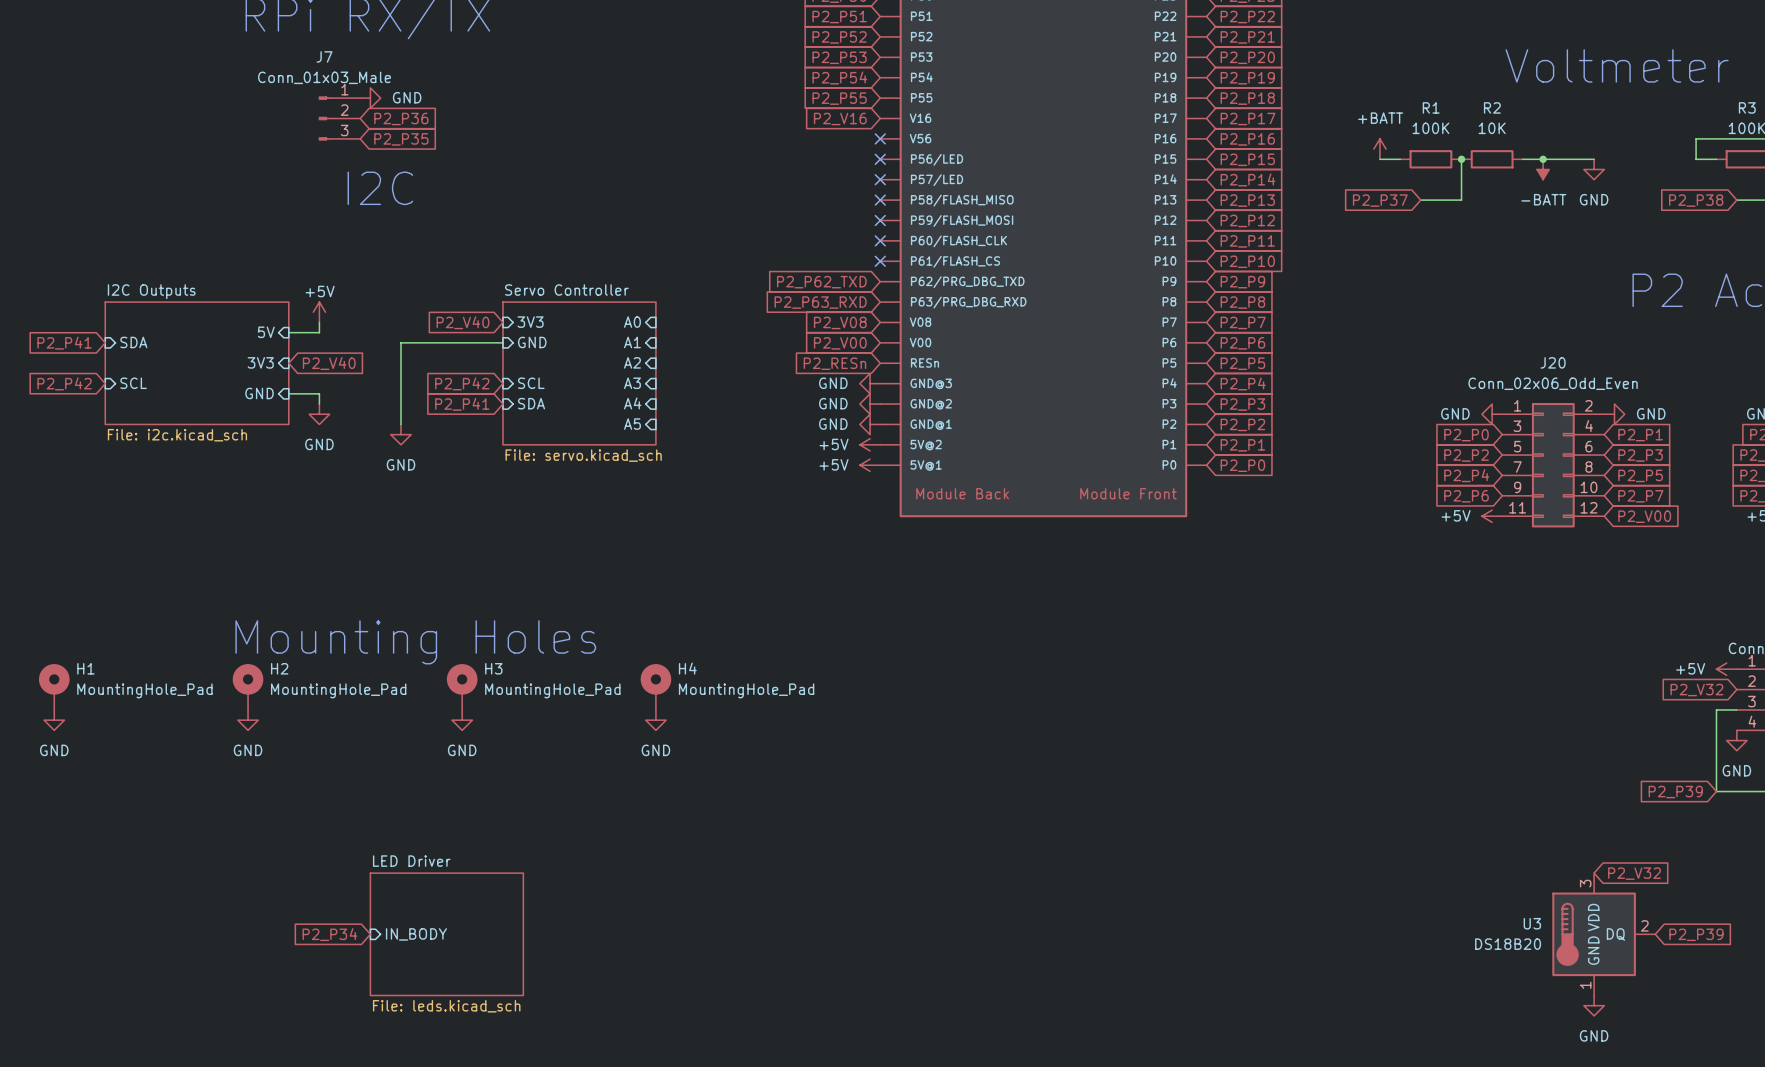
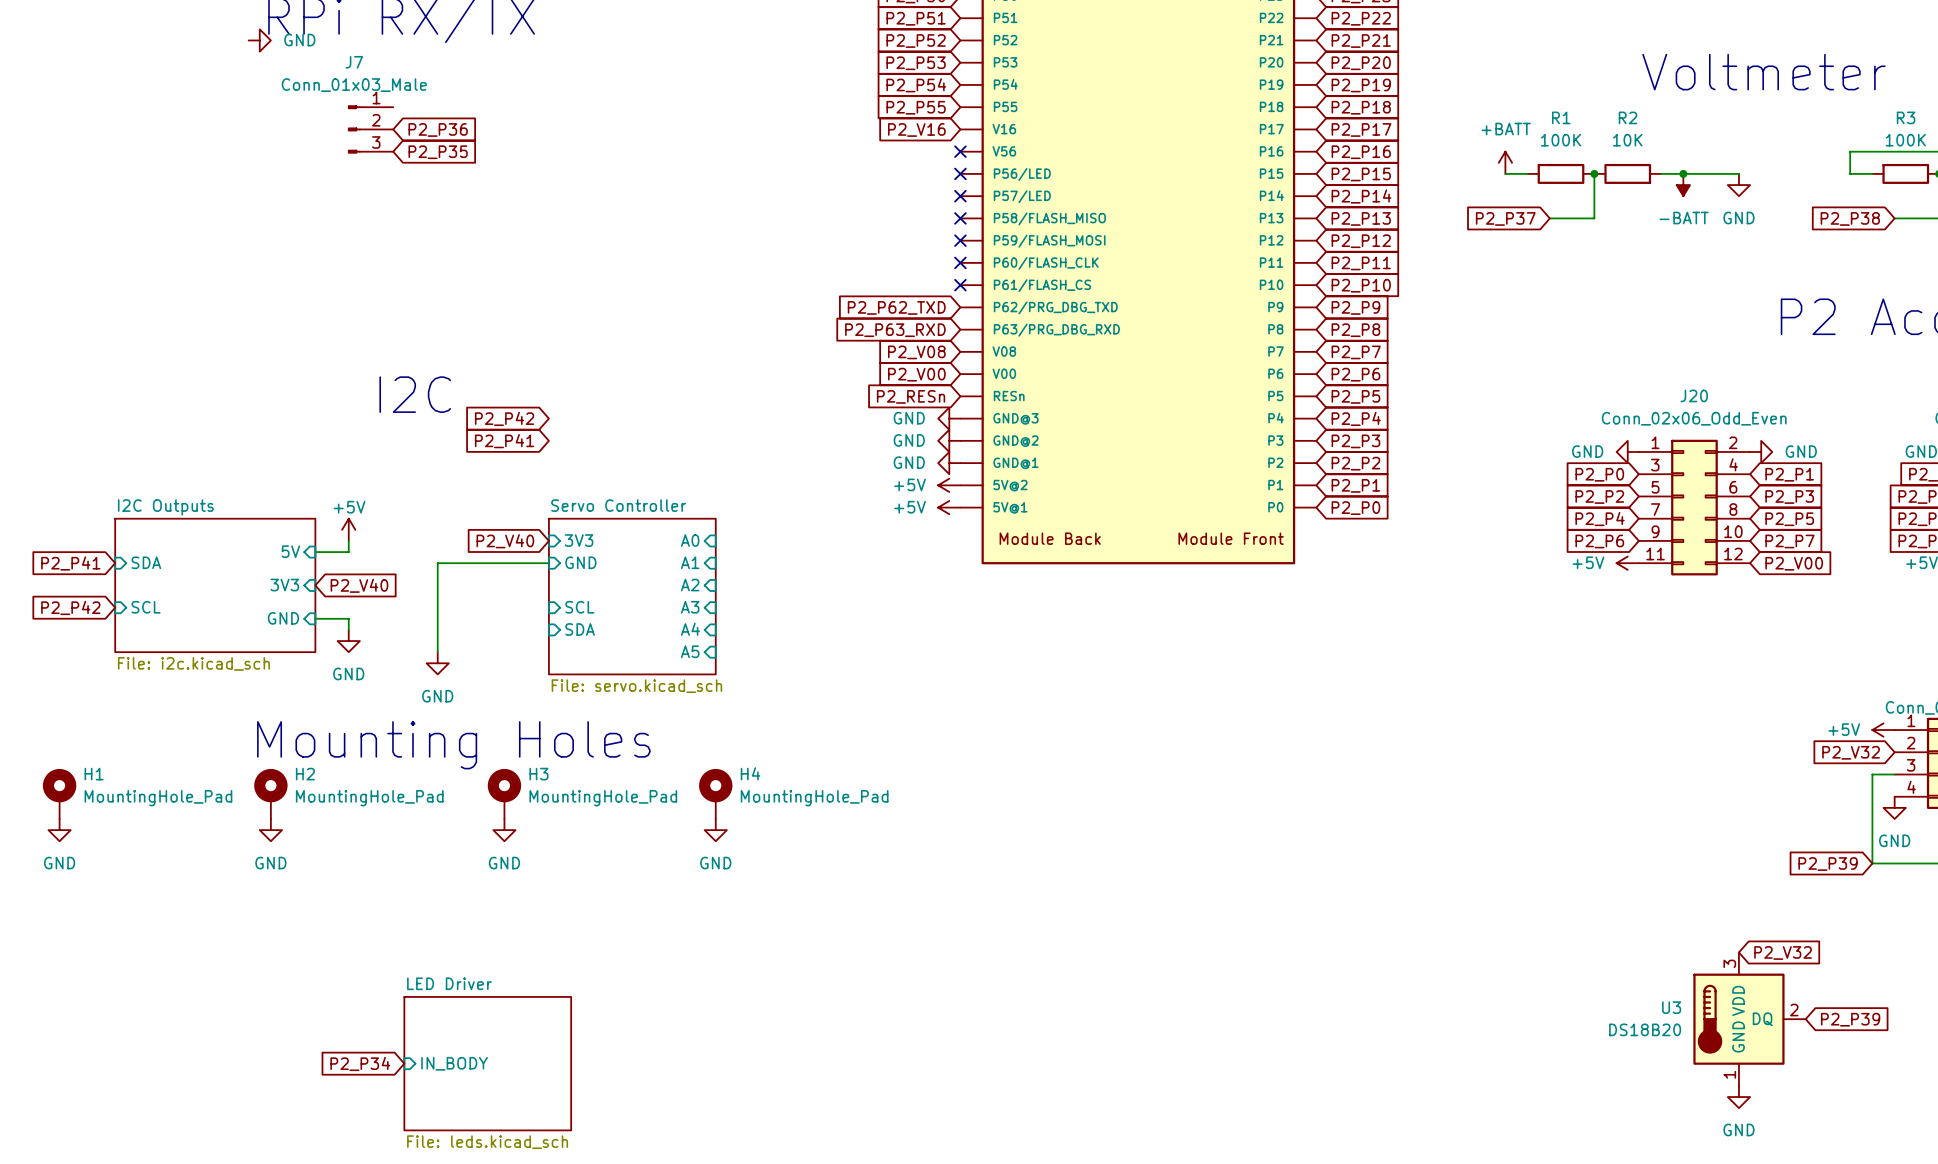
power symbol: none -> GND (259, 40)
power symbol: GND (370, 98) -> none
text position: I2C (380, 188) -> I2C (415, 394)
power symbol position: +5V (319, 312) -> +5V (348, 529)
wire: (319, 322) (319, 332) (288, 332) -> (348, 540) (348, 552) (315, 552)
global label: P2_V40 (463, 322) -> none
sheet pin: 3V3 (530, 322) -> none
sheet pin position: A0 (632, 322) -> A0 (690, 540)
sheet pin position: 5V (266, 332) -> 5V (290, 551)
sheet pin position: SDA (133, 342) -> SDA (146, 562)
wire: (502, 342) (400, 342) (400, 424) -> (548, 563) (437, 563) (437, 652)
sheet pin: GND (532, 342) -> none
sheet pin position: A1 (632, 342) -> A1 (690, 562)
global label position: P2_P41 (64, 343) -> P2_P41 (70, 563)
sheet pin: 3V3 (260, 362) -> none
sheet pin position: A2 (632, 362) -> A2 (690, 585)
sheet I2C Outputs position: (197, 363) -> (215, 585)
global label: P2_V40 (329, 363) -> none
sheet Servo Controller position: (579, 373) -> (632, 596)
global label position: P2_P42 (64, 383) -> P2_P42 (70, 607)
sheet pin position: SCL (133, 383) -> SCL (146, 607)
sheet pin position: SCL (531, 383) -> SCL (579, 607)
sheet pin position: A3 (632, 383) -> A3 (690, 607)
sheet pin: GND (259, 393) -> none
wire: (288, 393) (319, 393) (319, 404) -> (315, 618) (348, 618) (348, 629)
sheet pin position: SDA (531, 403) -> SDA (580, 629)
sheet pin position: A4 (632, 403) -> A4 (690, 629)
power symbol: GND (319, 414) -> none
sheet pin position: A5 (632, 424) -> A5 (690, 651)
power symbol: GND (400, 434) -> none
sheet pin: none -> 3V3 (579, 540)
global label: none -> P2_V40 (505, 541)
sheet pin: none -> GND (580, 562)
sheet pin: none -> 3V3 (284, 585)
global label: none -> P2_V40 (359, 585)
sheet pin: none -> GND (283, 618)
power symbol: none -> GND (348, 641)
power symbol: none -> GND (437, 663)
text position: Mounting Holes (415, 642) -> Mounting Holes (453, 745)
H1 position: (54, 687) -> (59, 793)
H2 position: (248, 687) -> (270, 793)
H3 position: (462, 687) -> (504, 793)
H4 position: (655, 687) -> (715, 793)
power symbol position: GND (54, 720) -> GND (59, 830)
power symbol position: GND (248, 720) -> GND (270, 830)
power symbol position: GND (462, 720) -> GND (504, 830)
power symbol position: GND (655, 720) -> GND (715, 830)
global label position: P2_P34 (329, 934) -> P2_P34 (360, 1063)
sheet pin position: IN_BODY (416, 934) -> IN_BODY (454, 1063)
sheet LED Driver position: (446, 934) -> (487, 1063)

